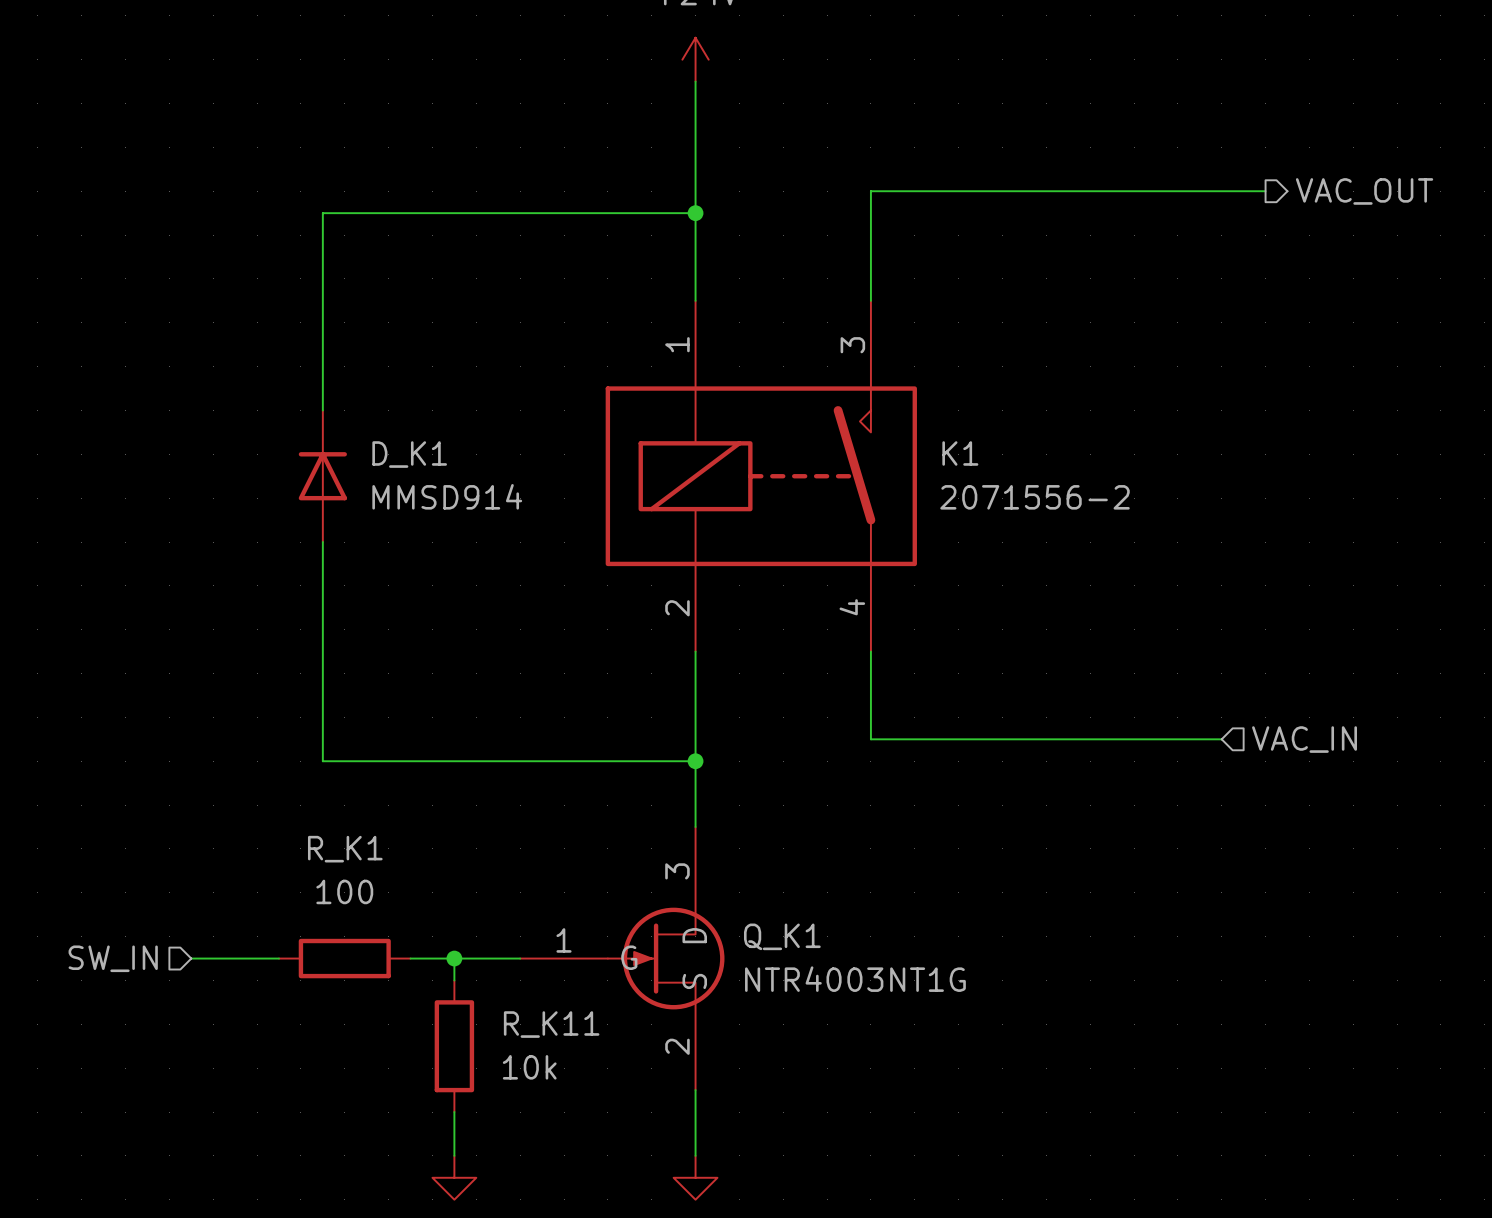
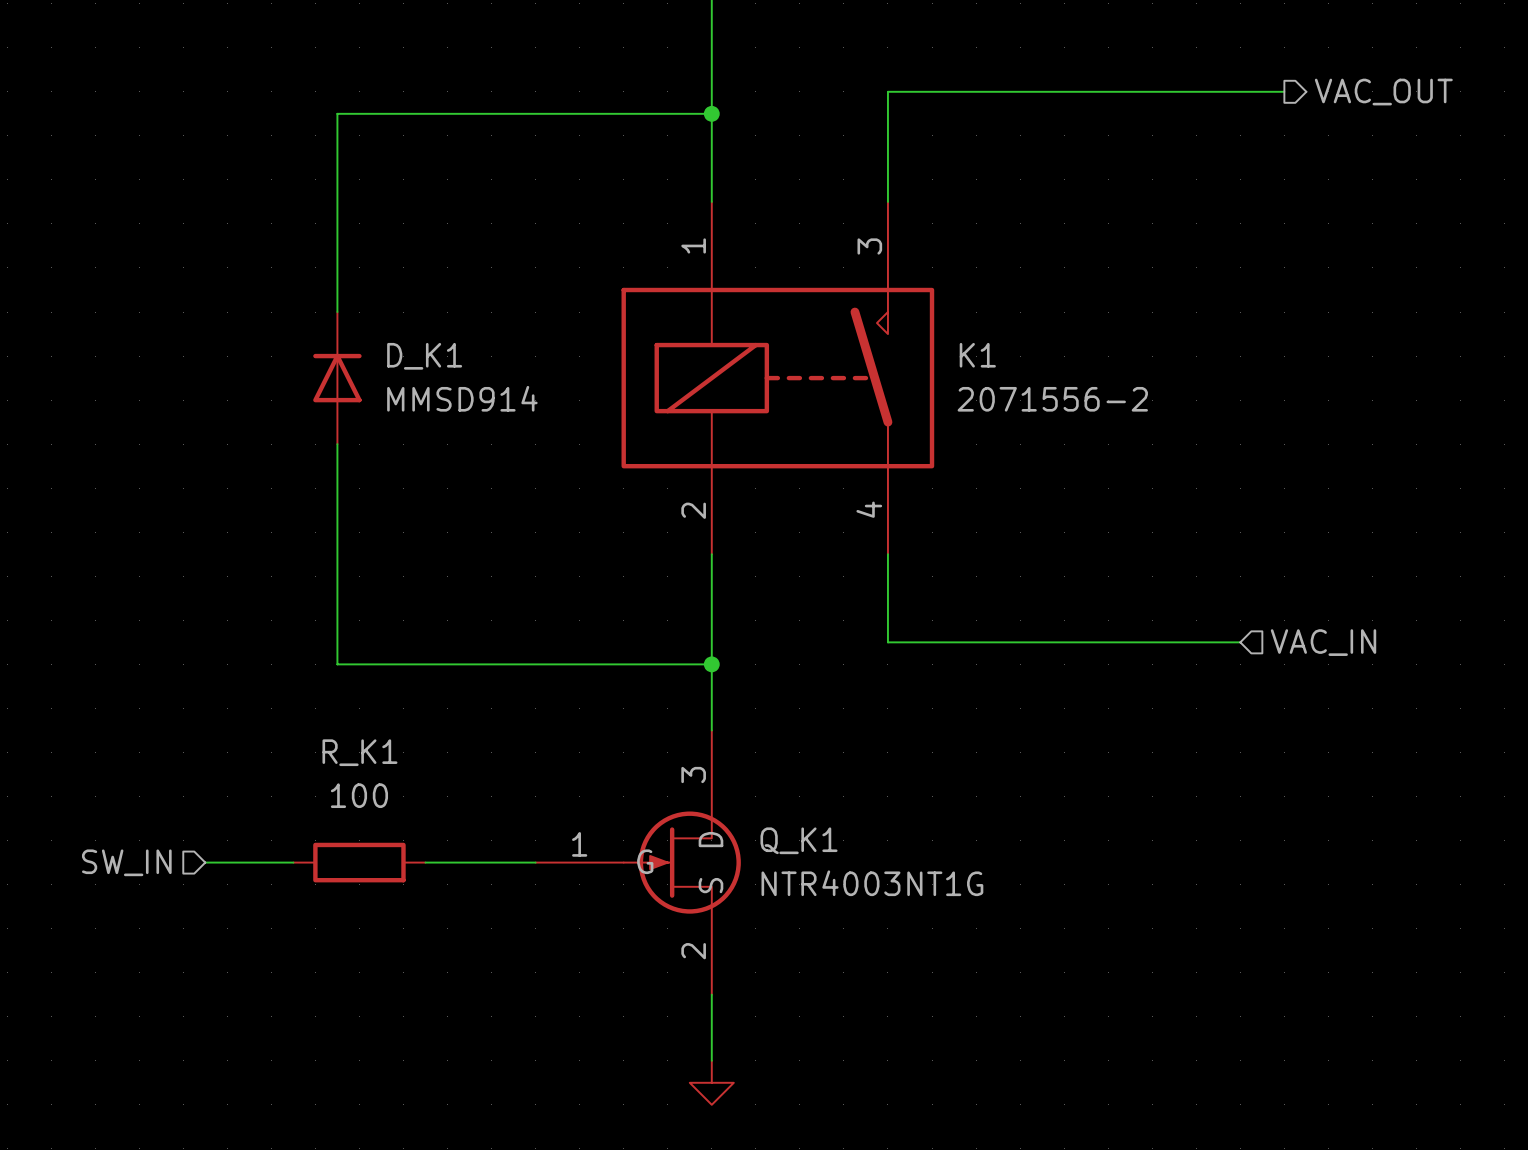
wire: (454, 958) (454, 980) -> none
junction: (454, 958) -> none
R_K11: 10k (454, 1046) -> none
wire: (454, 1112) (454, 1155) -> none
power symbol: (454, 1177) -> none

